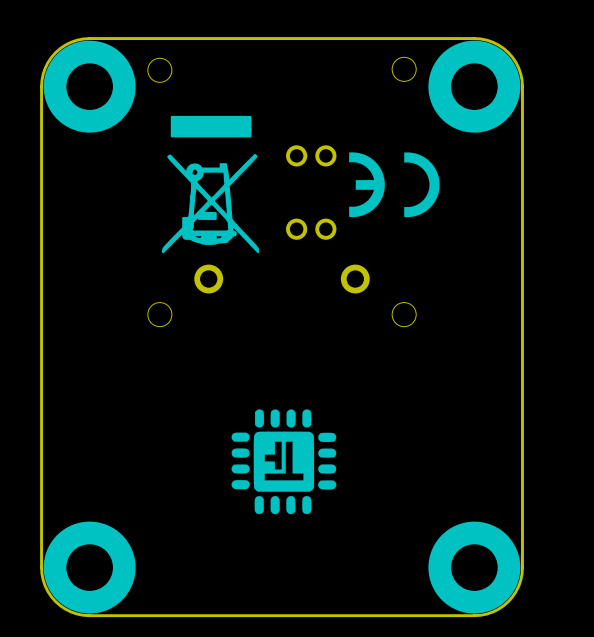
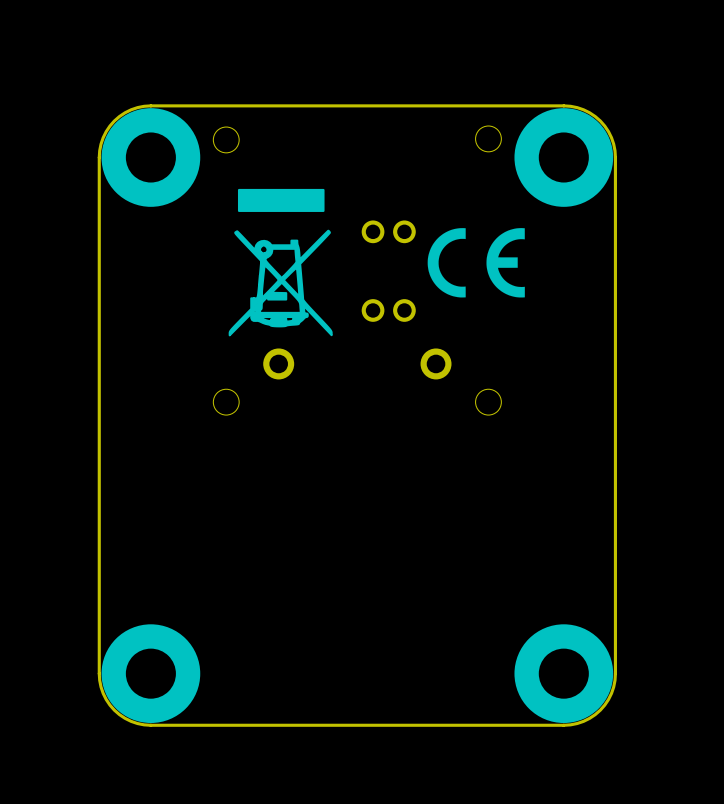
drawing shape: [349, 152, 440, 218] -> [427, 228, 525, 298]
drawing: [231, 409, 337, 515] -> none

